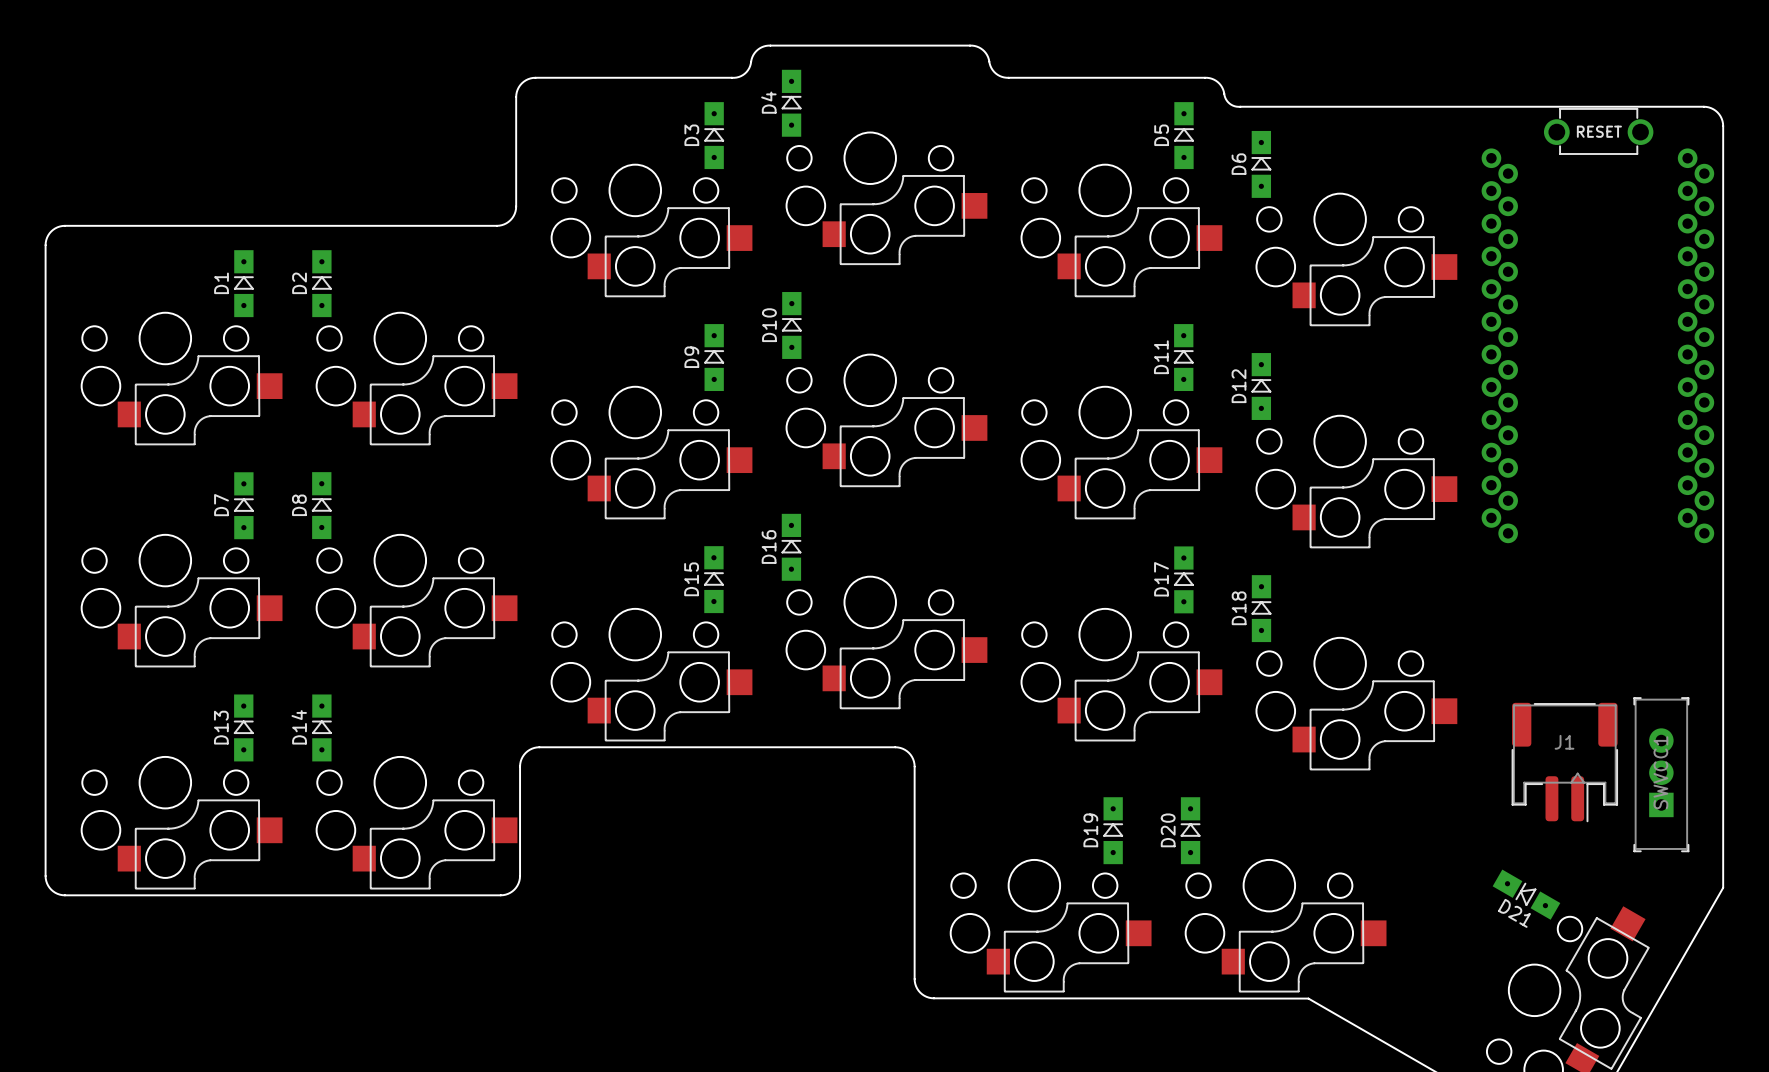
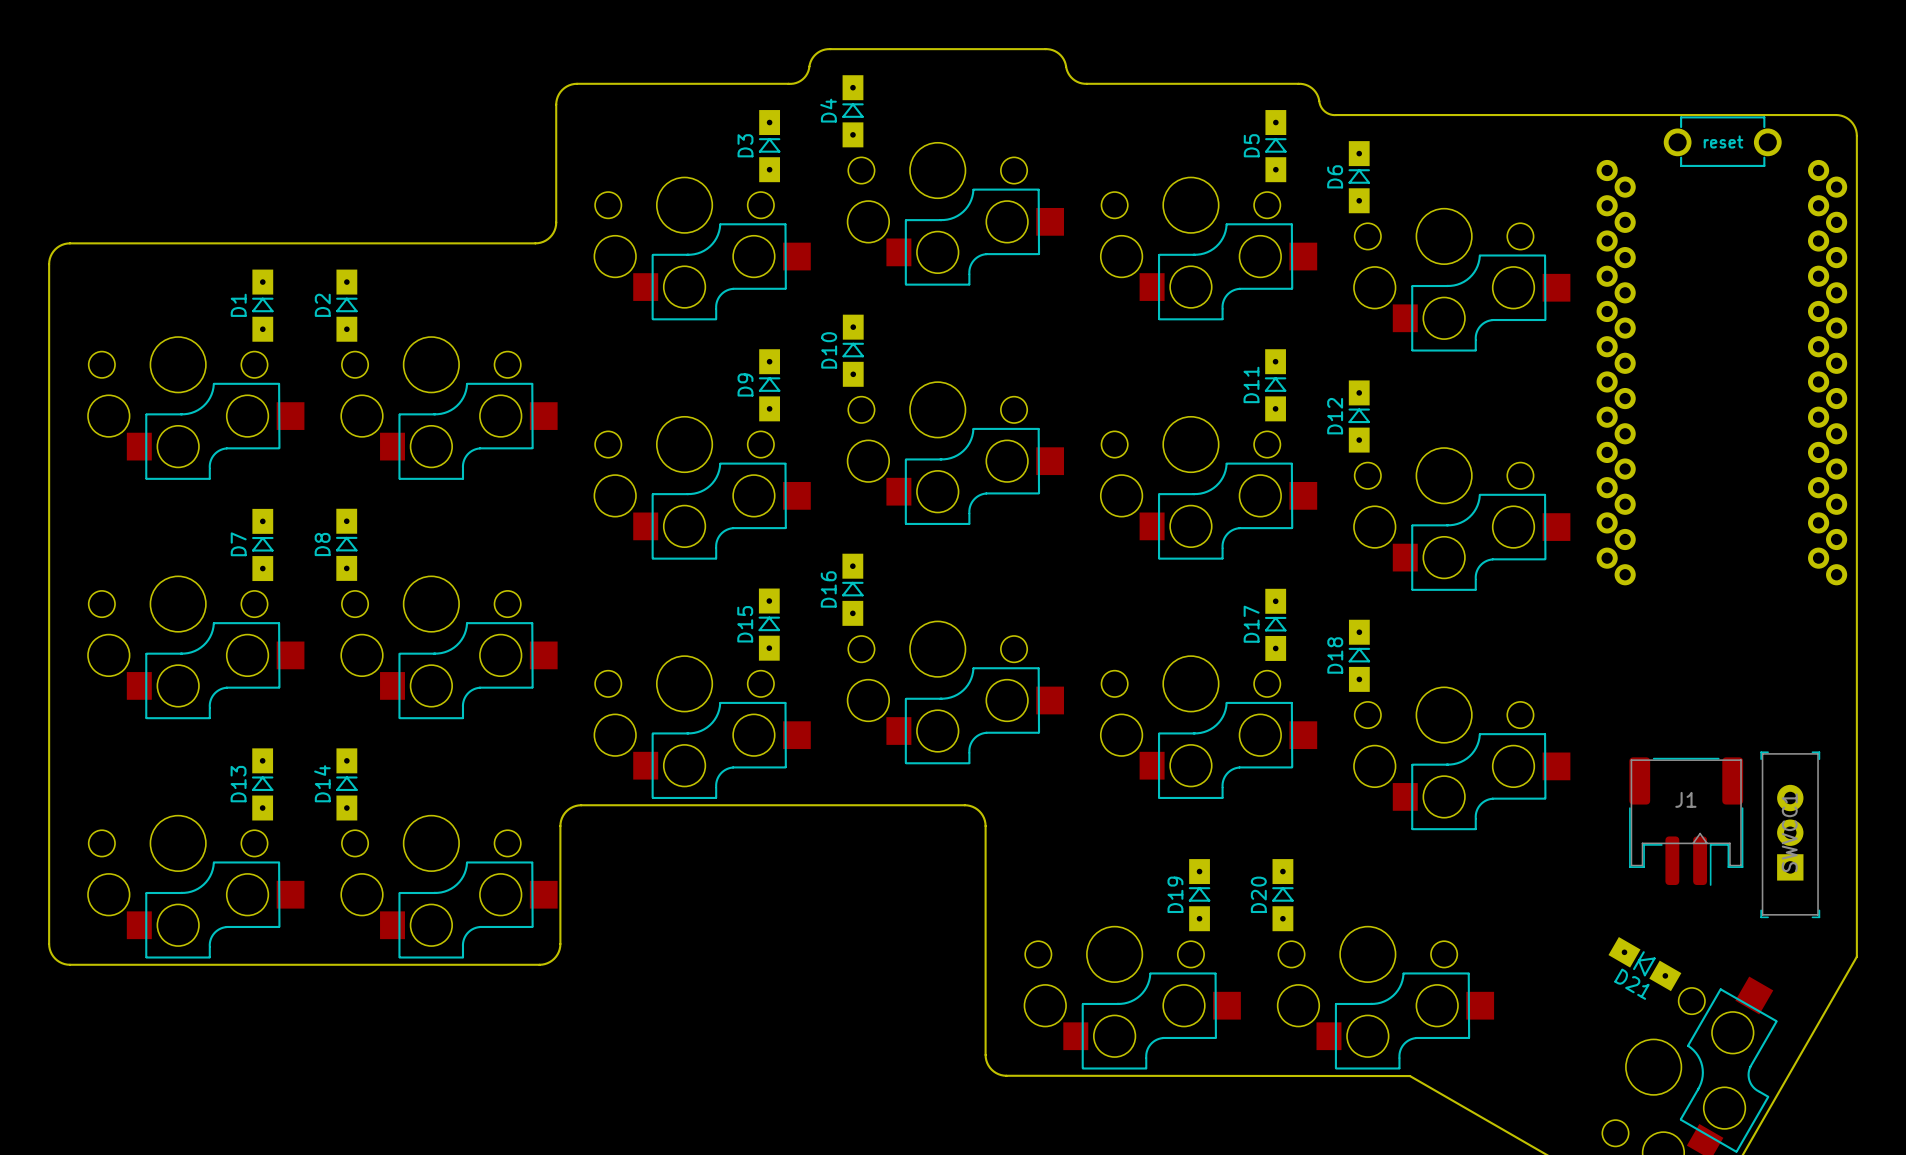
part text: RESET (1599, 131) -> reset (1723, 141)

